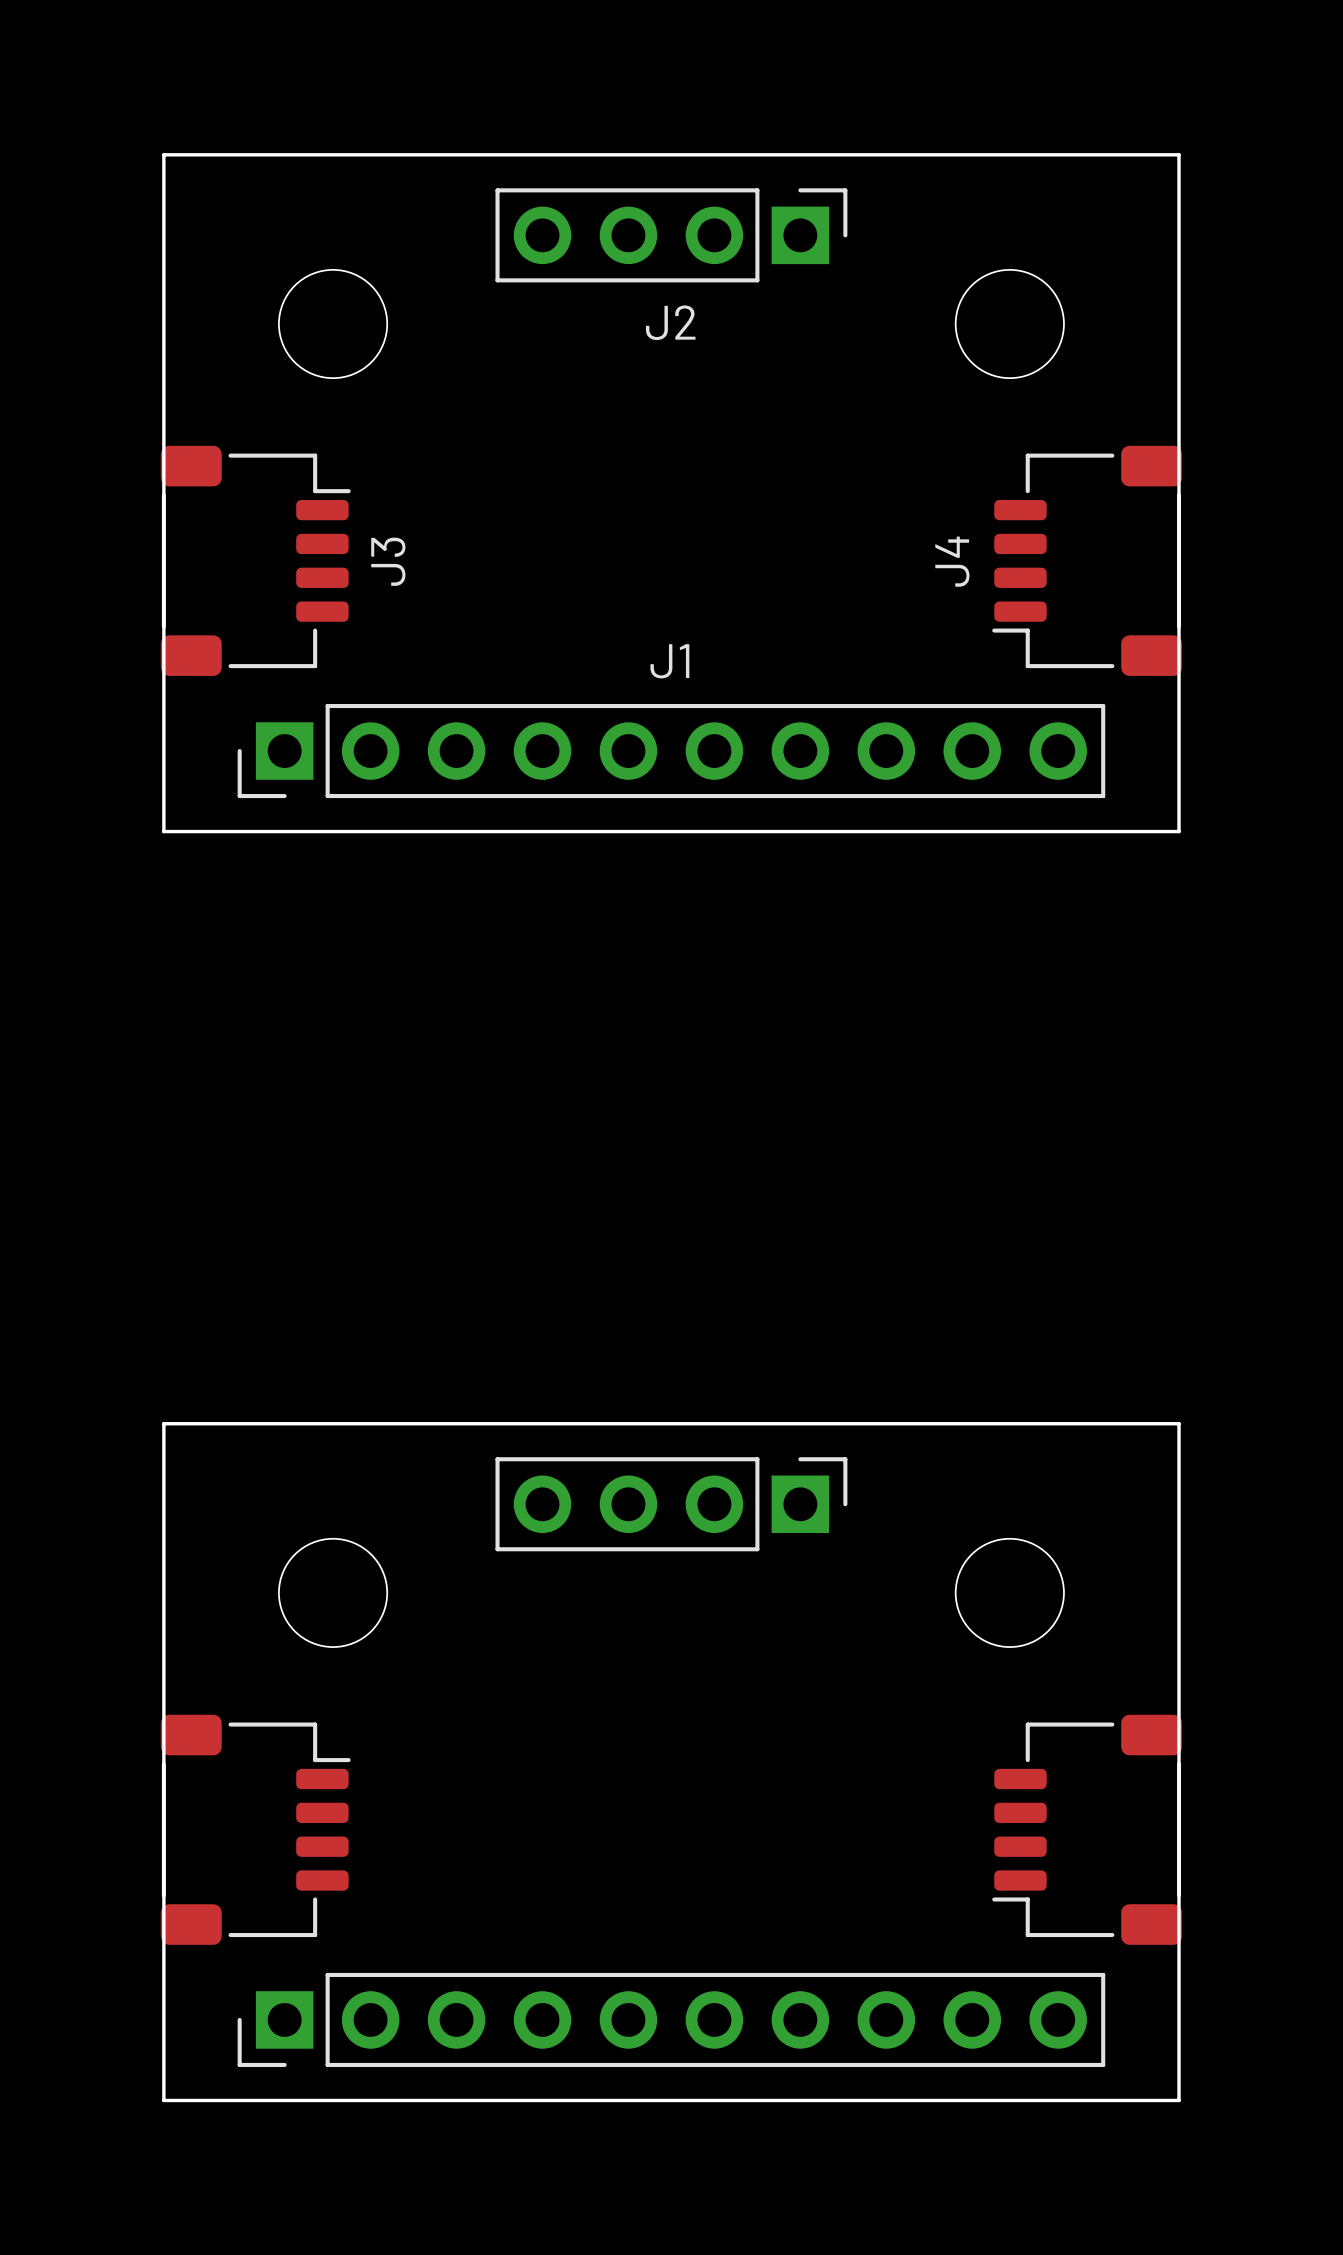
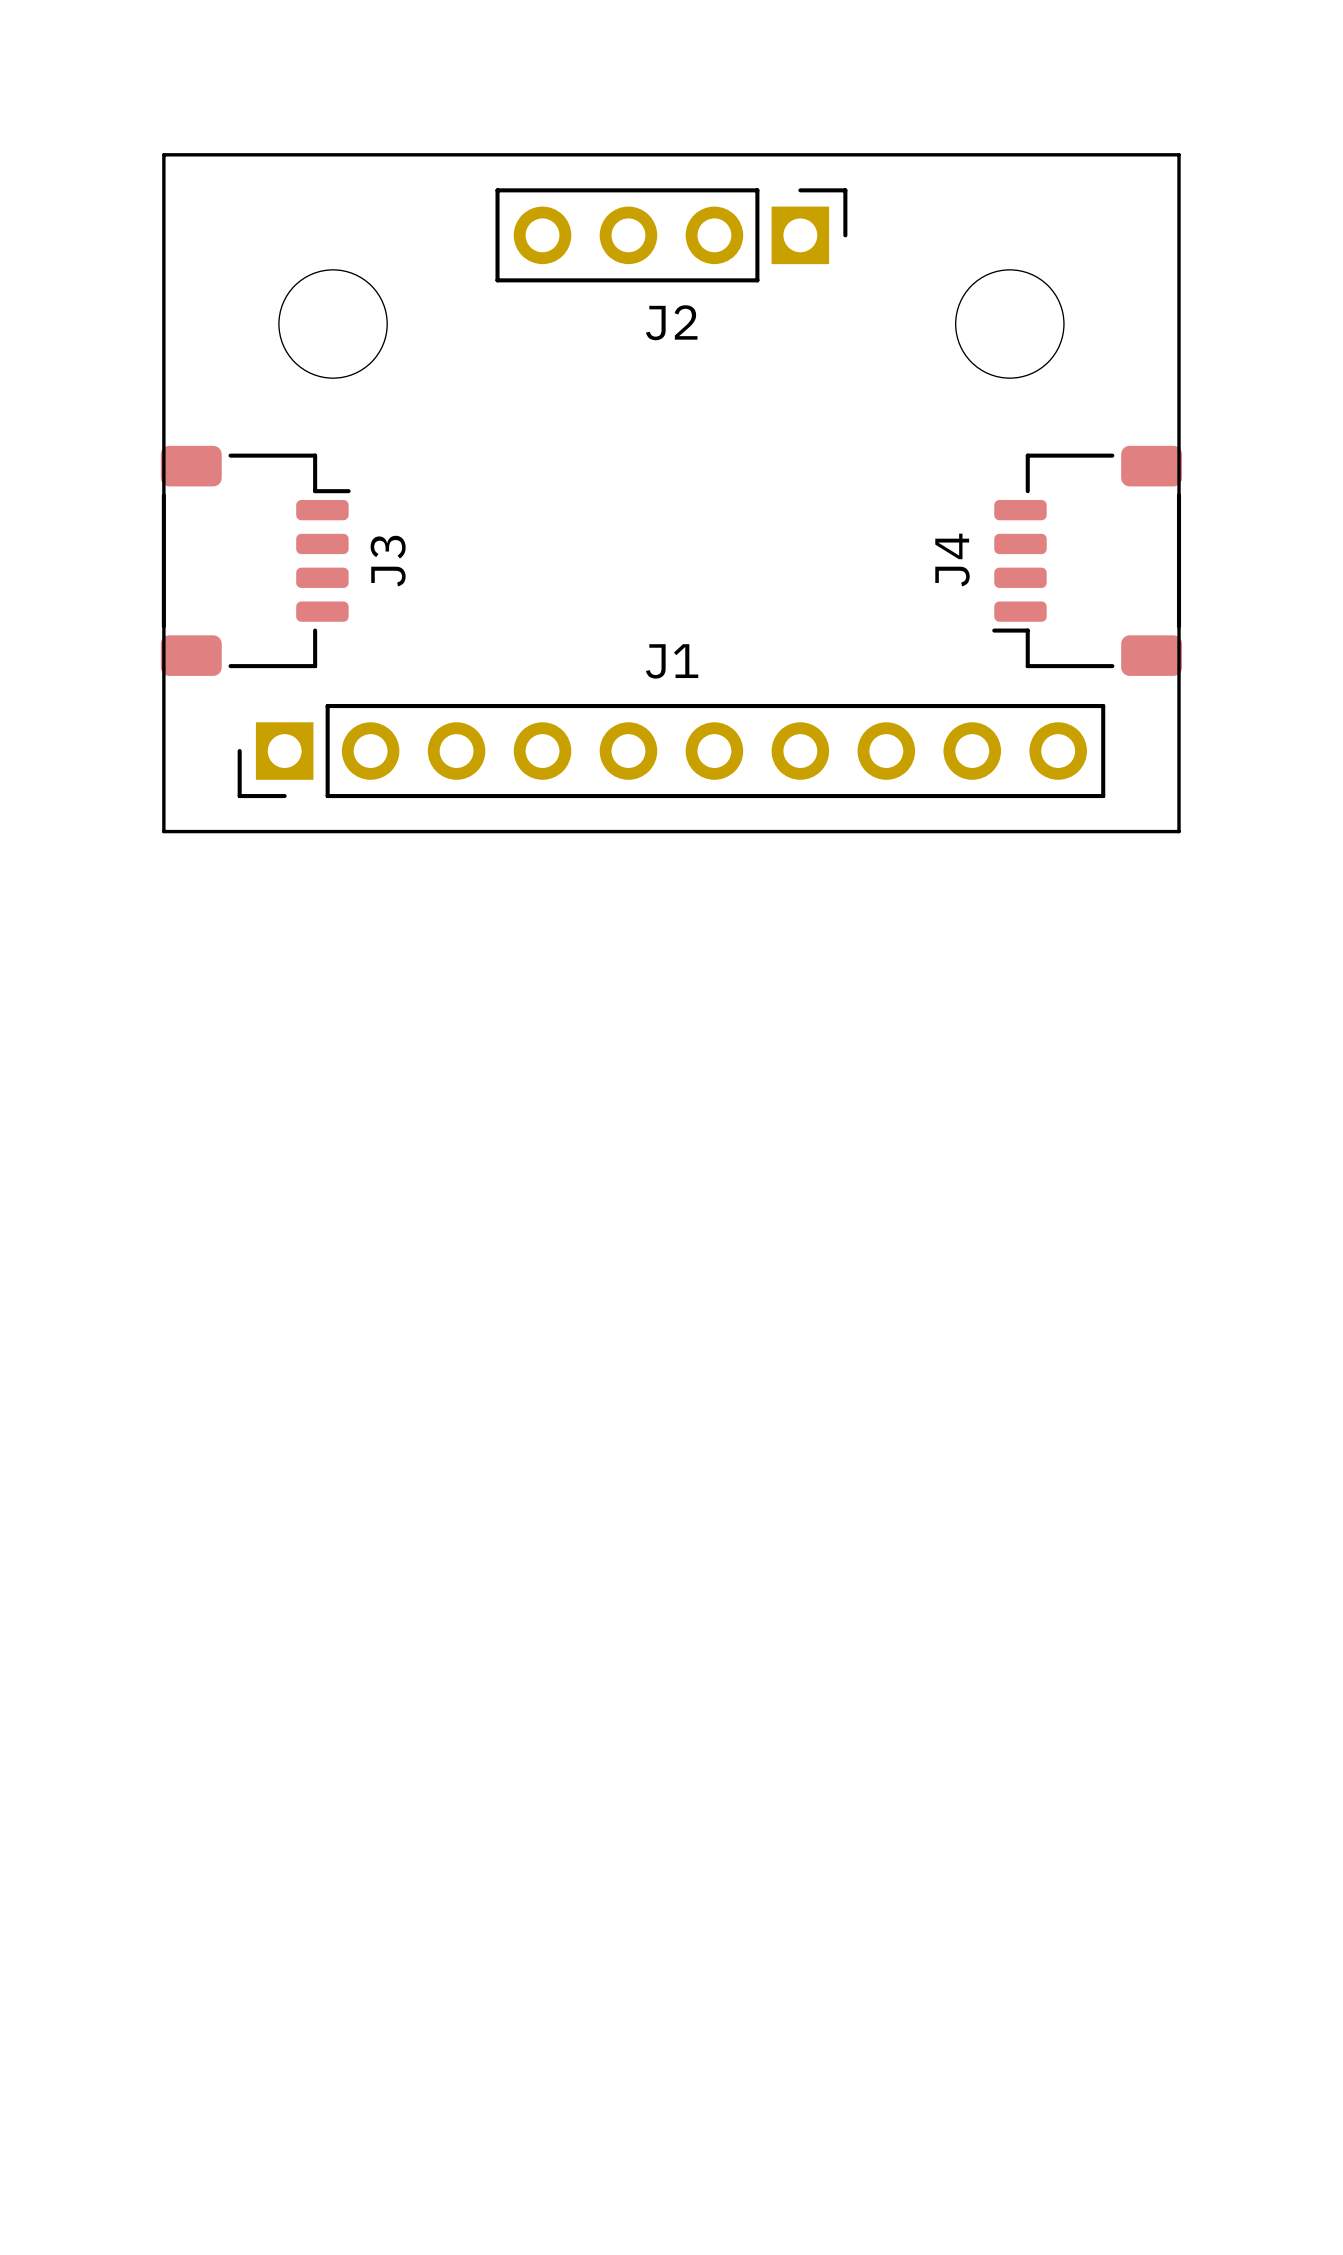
part: (671, 1762) -> none

